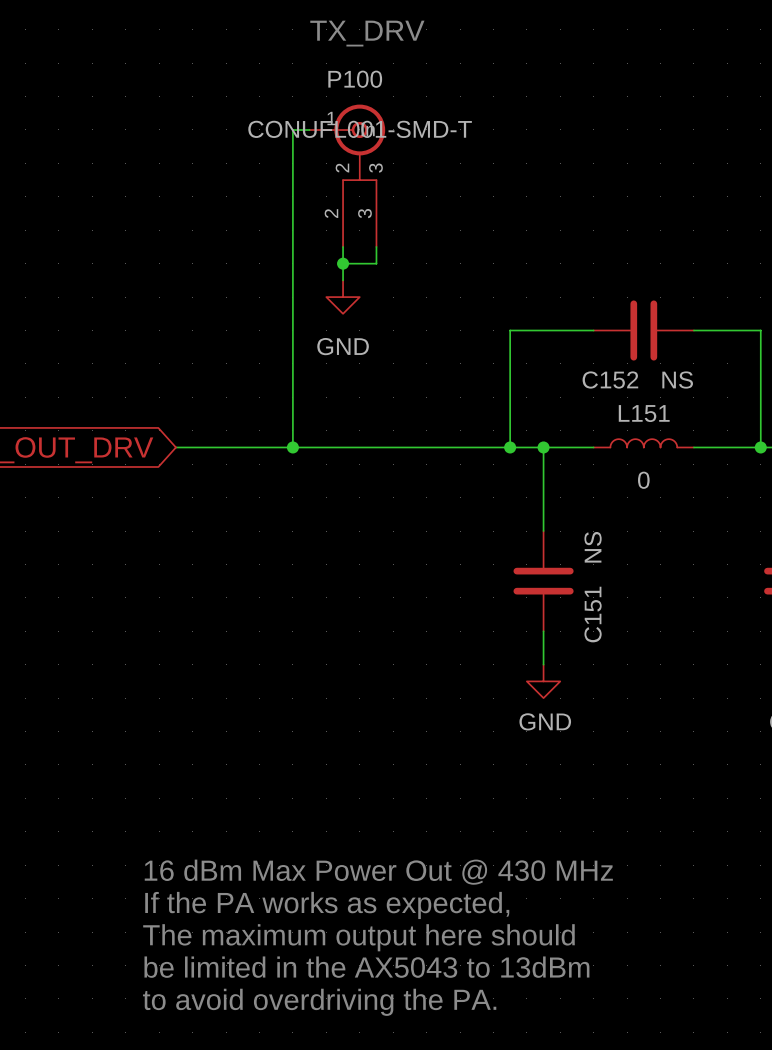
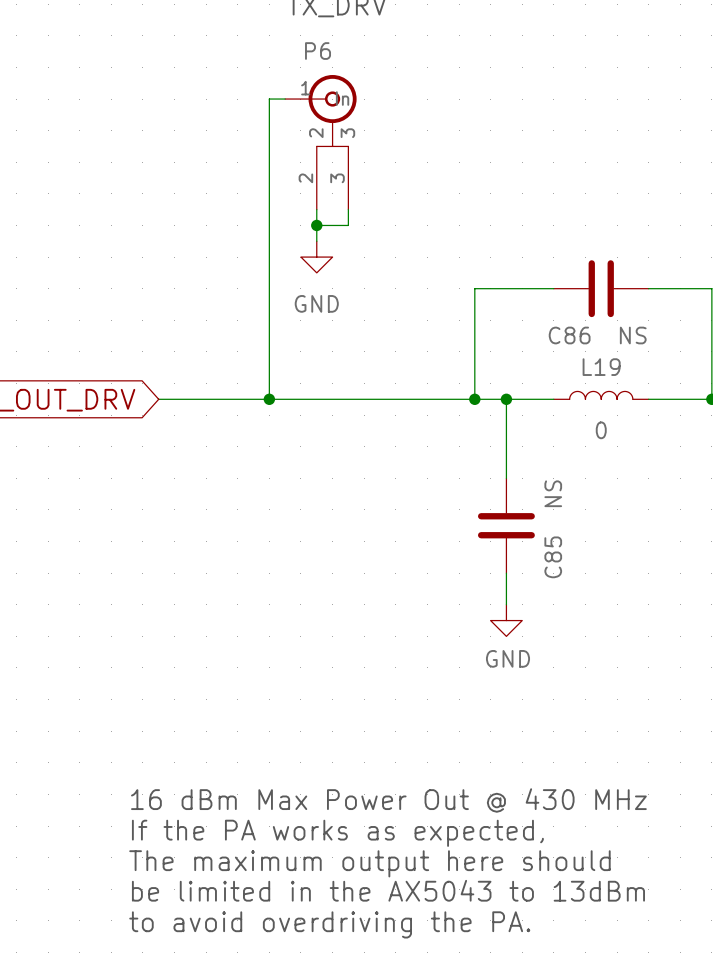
P100 name: P100 (355, 79) -> P6 (318, 51)
P100 value: CONUFL001-SMD-T (360, 129) -> none
C152 name: C152 (610, 380) -> C86 (569, 335)
L151 name: L151 (644, 413) -> L19 (601, 367)
C151 name: C151 (593, 614) -> C85 (553, 557)

